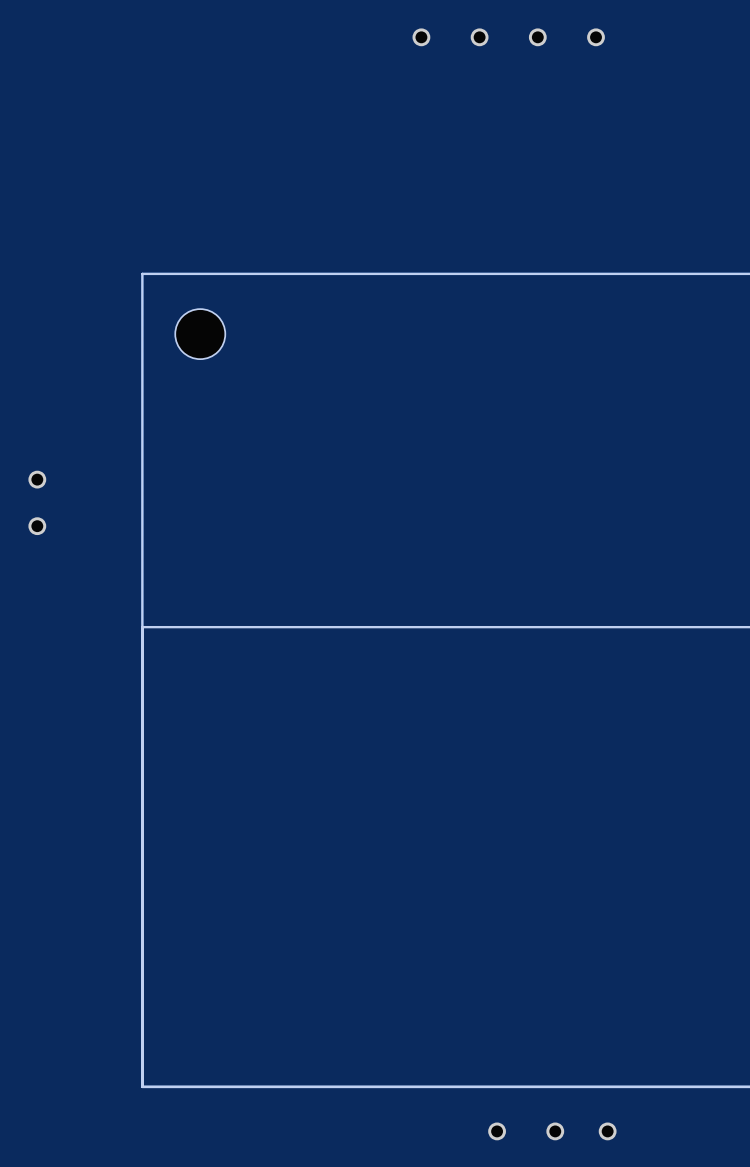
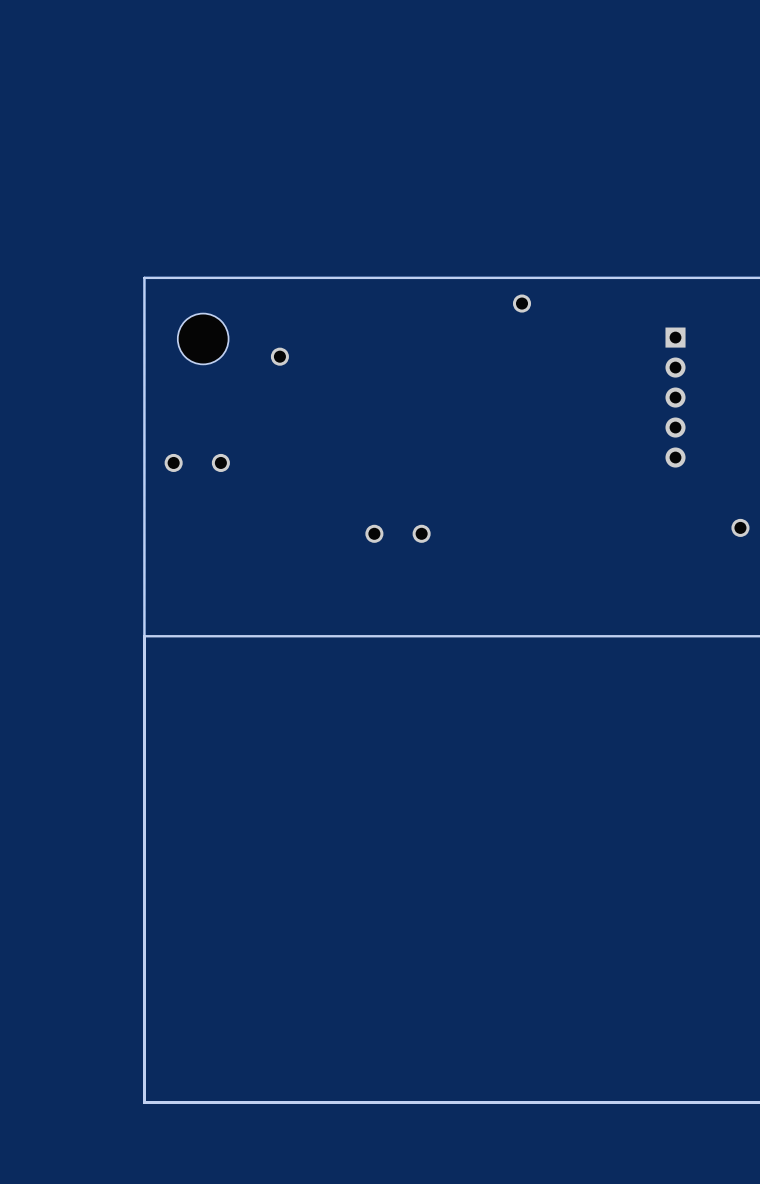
part: (421, 37) -> none
part: (479, 37) -> none
part: (537, 37) -> none
part: (596, 37) -> none
part: none -> (522, 303)
part: none -> (279, 356)
part: none -> (675, 397)
part: none -> (173, 462)
part: none -> (220, 462)
part: (37, 479) -> none
part: none -> (740, 527)
part: (37, 526) -> none
part: none -> (374, 533)
part: none -> (421, 533)
part: (497, 1131) -> none
part: (555, 1131) -> none
part: (607, 1131) -> none

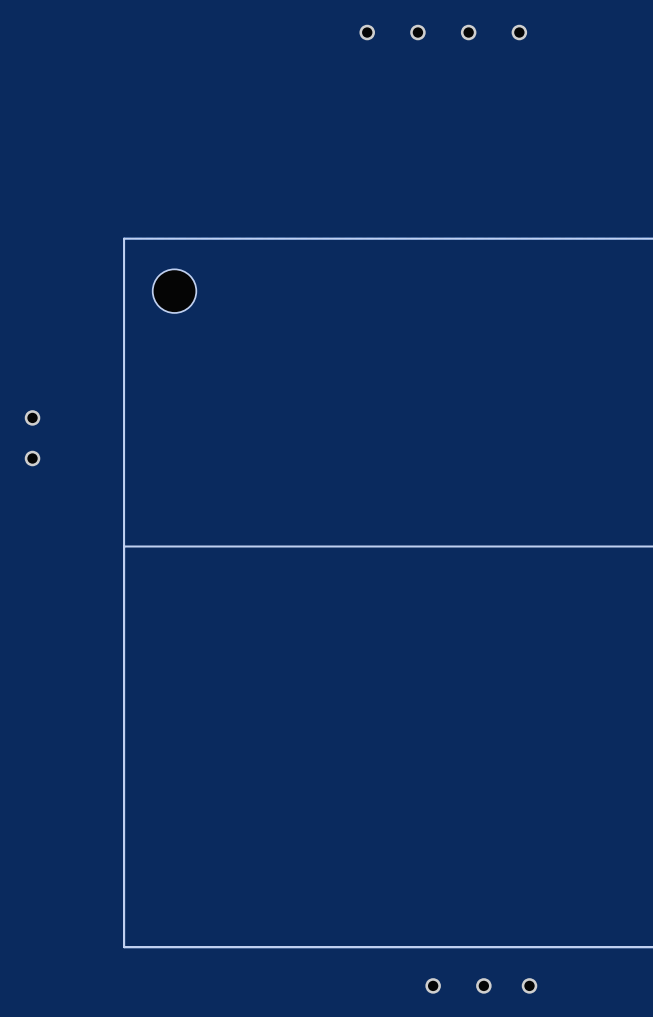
part: none -> (367, 32)
part: none -> (417, 32)
part: none -> (468, 32)
part: none -> (519, 32)
part: (522, 303) -> none
part: (279, 356) -> none
part: (675, 397) -> none
part: (173, 462) -> none
part: (220, 462) -> none
part: none -> (32, 417)
part: (740, 527) -> none
part: none -> (32, 458)
part: (374, 533) -> none
part: (421, 533) -> none
part: none -> (433, 985)
part: none -> (483, 985)
part: none -> (529, 985)

